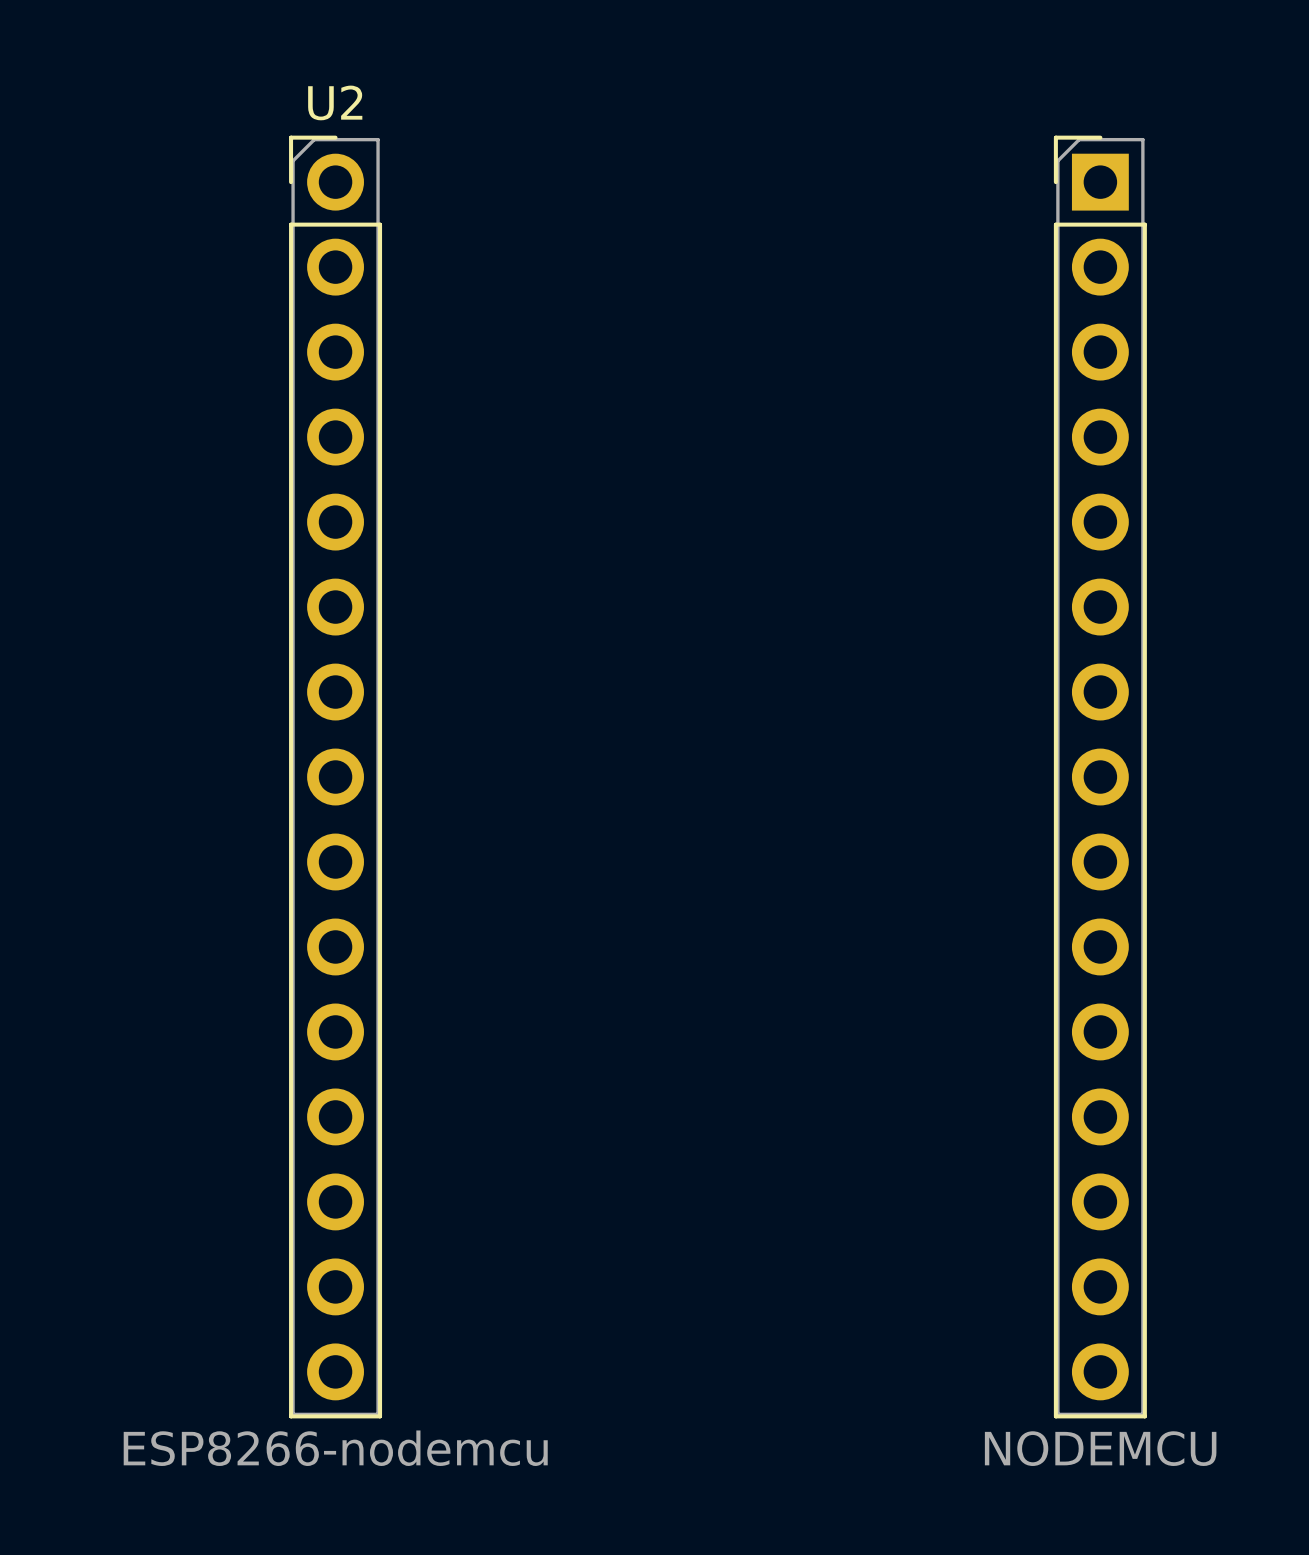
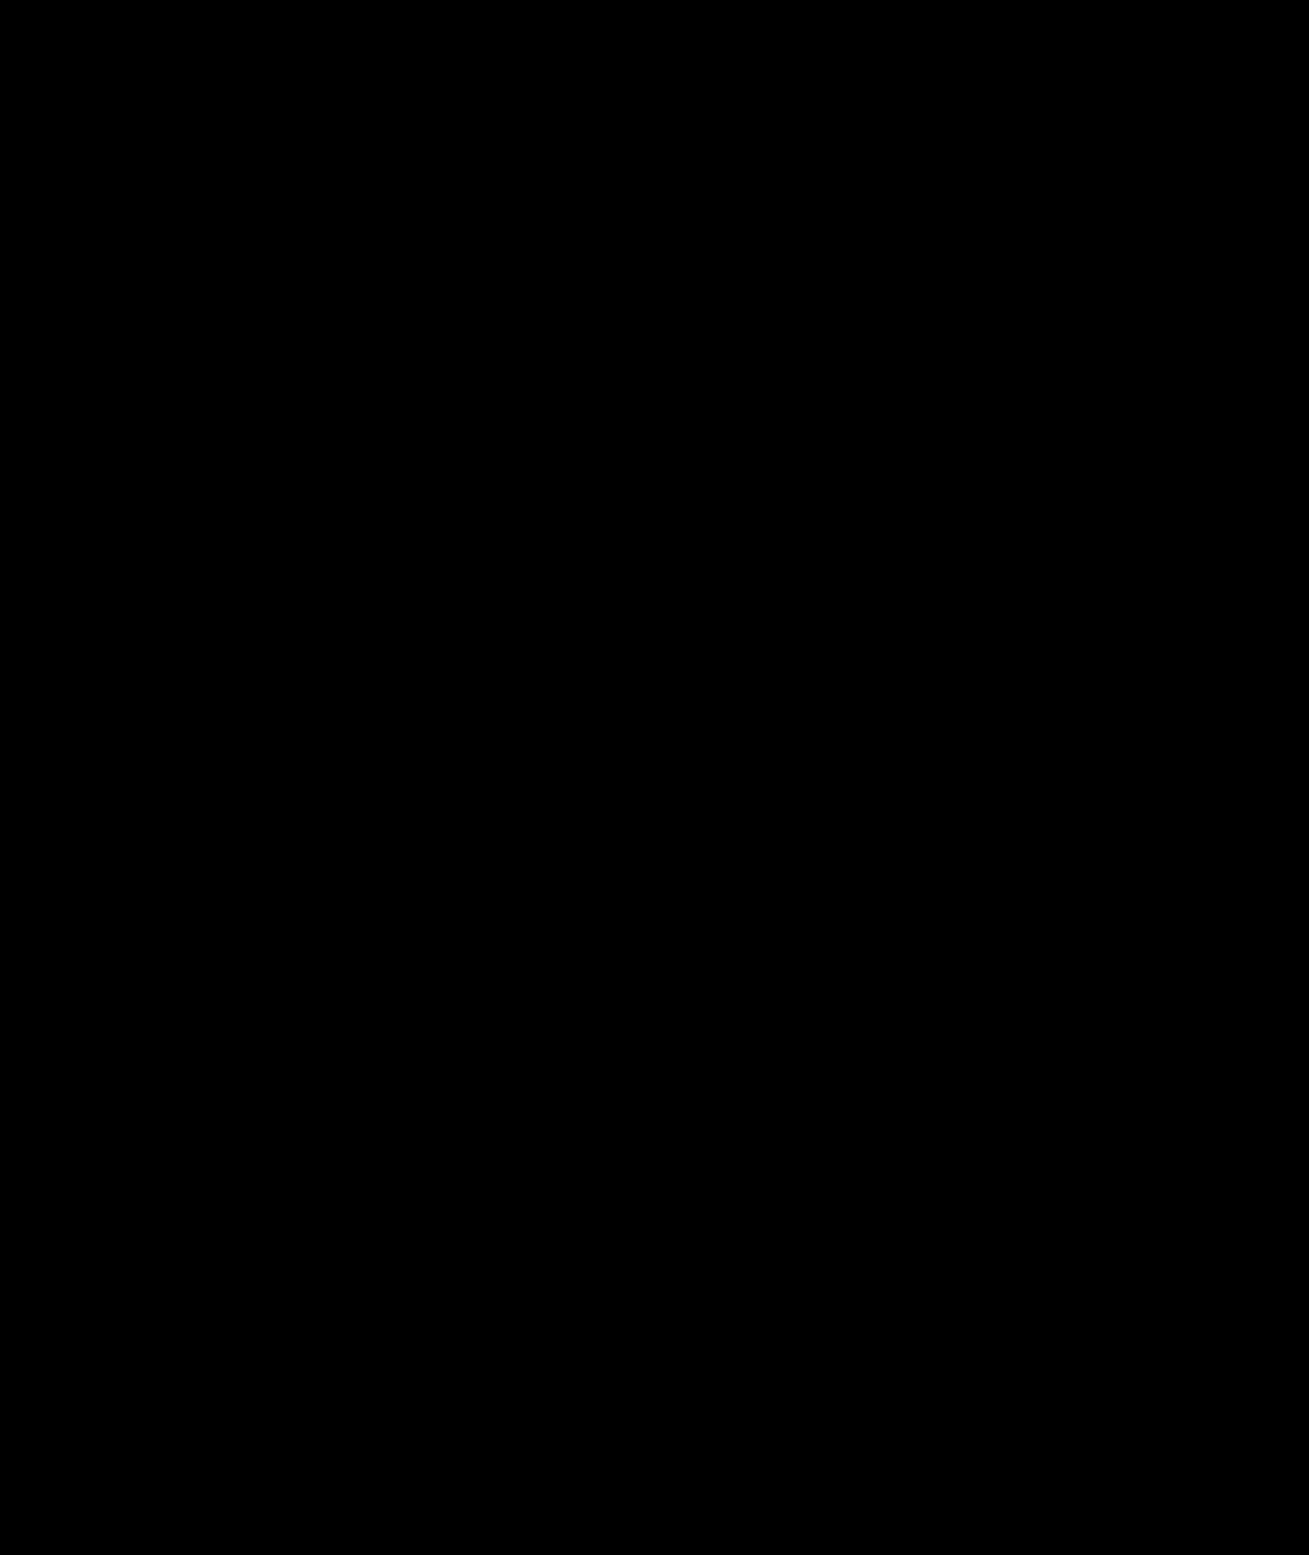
U2: ESP8266-nodemcu (717, 777) -> none

